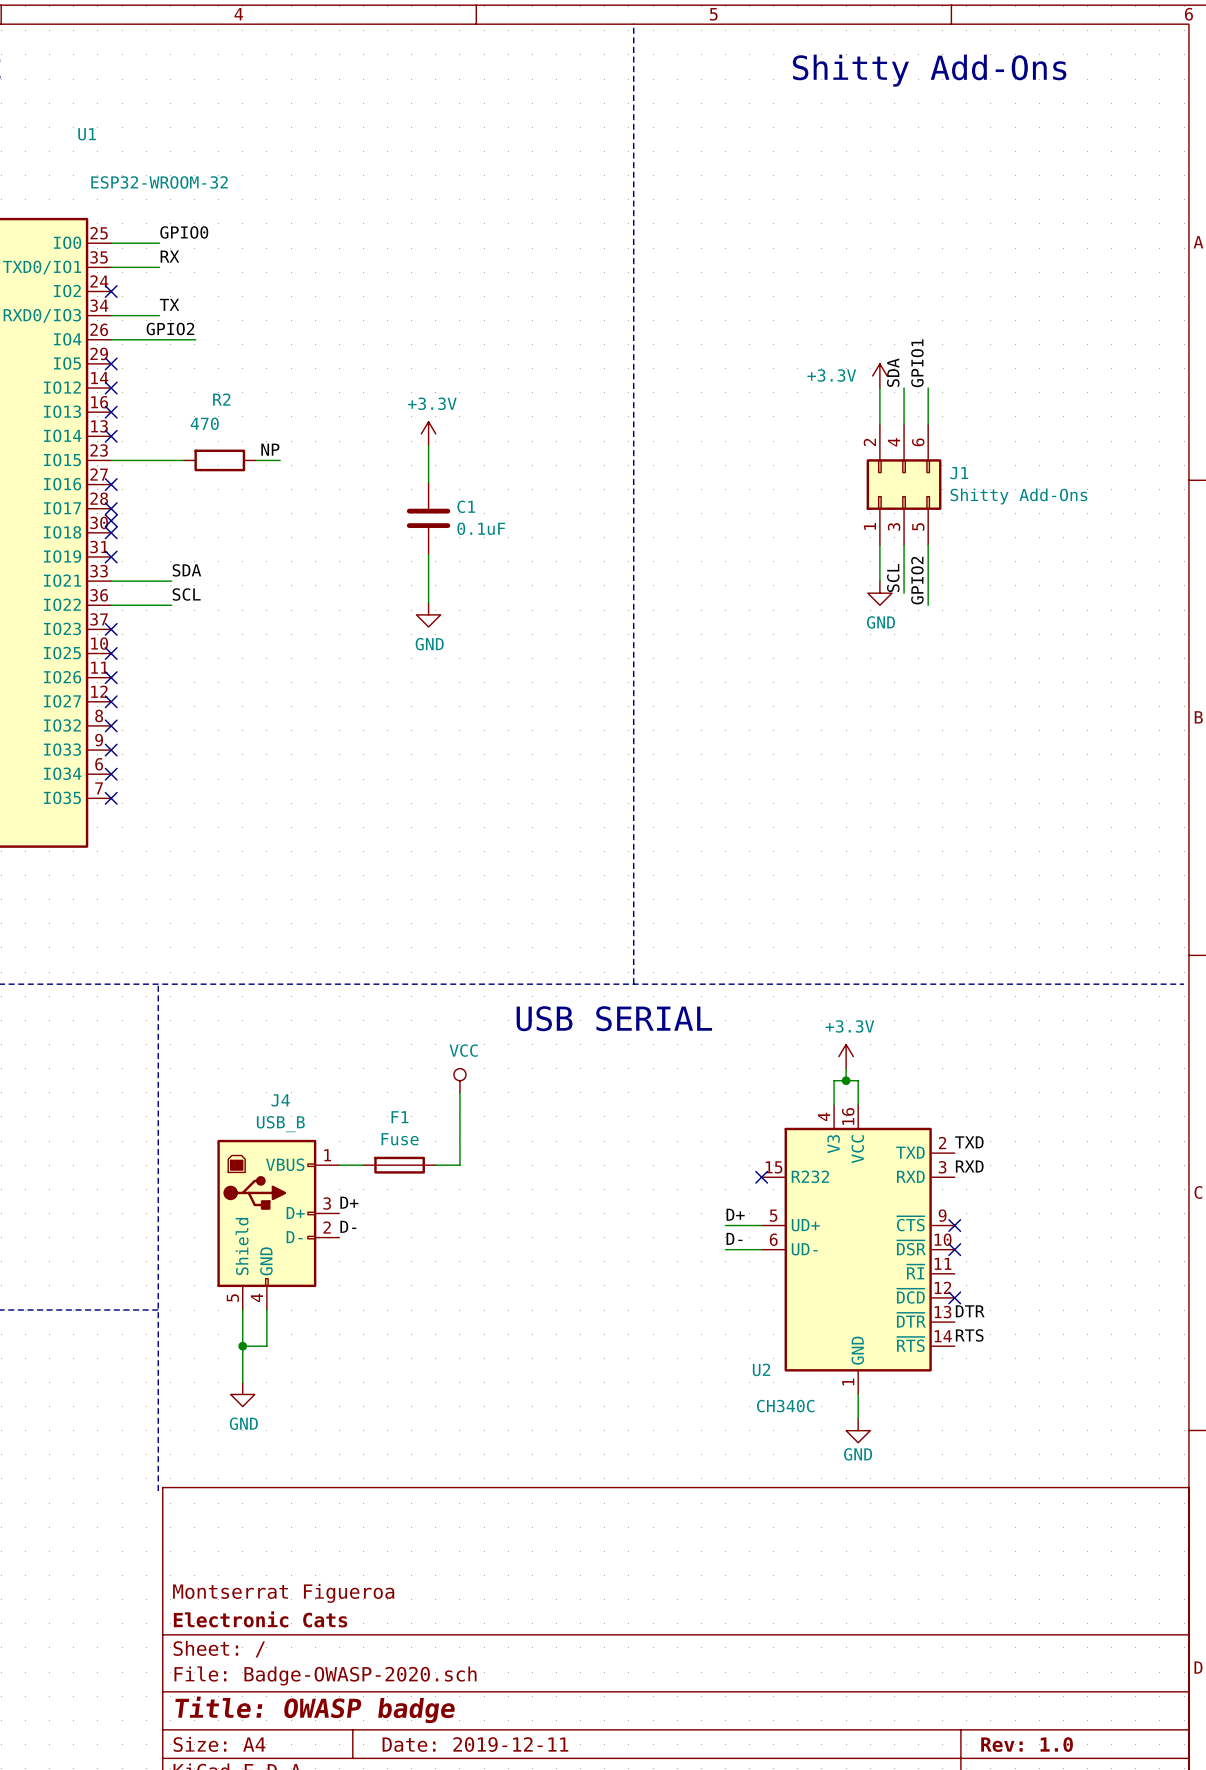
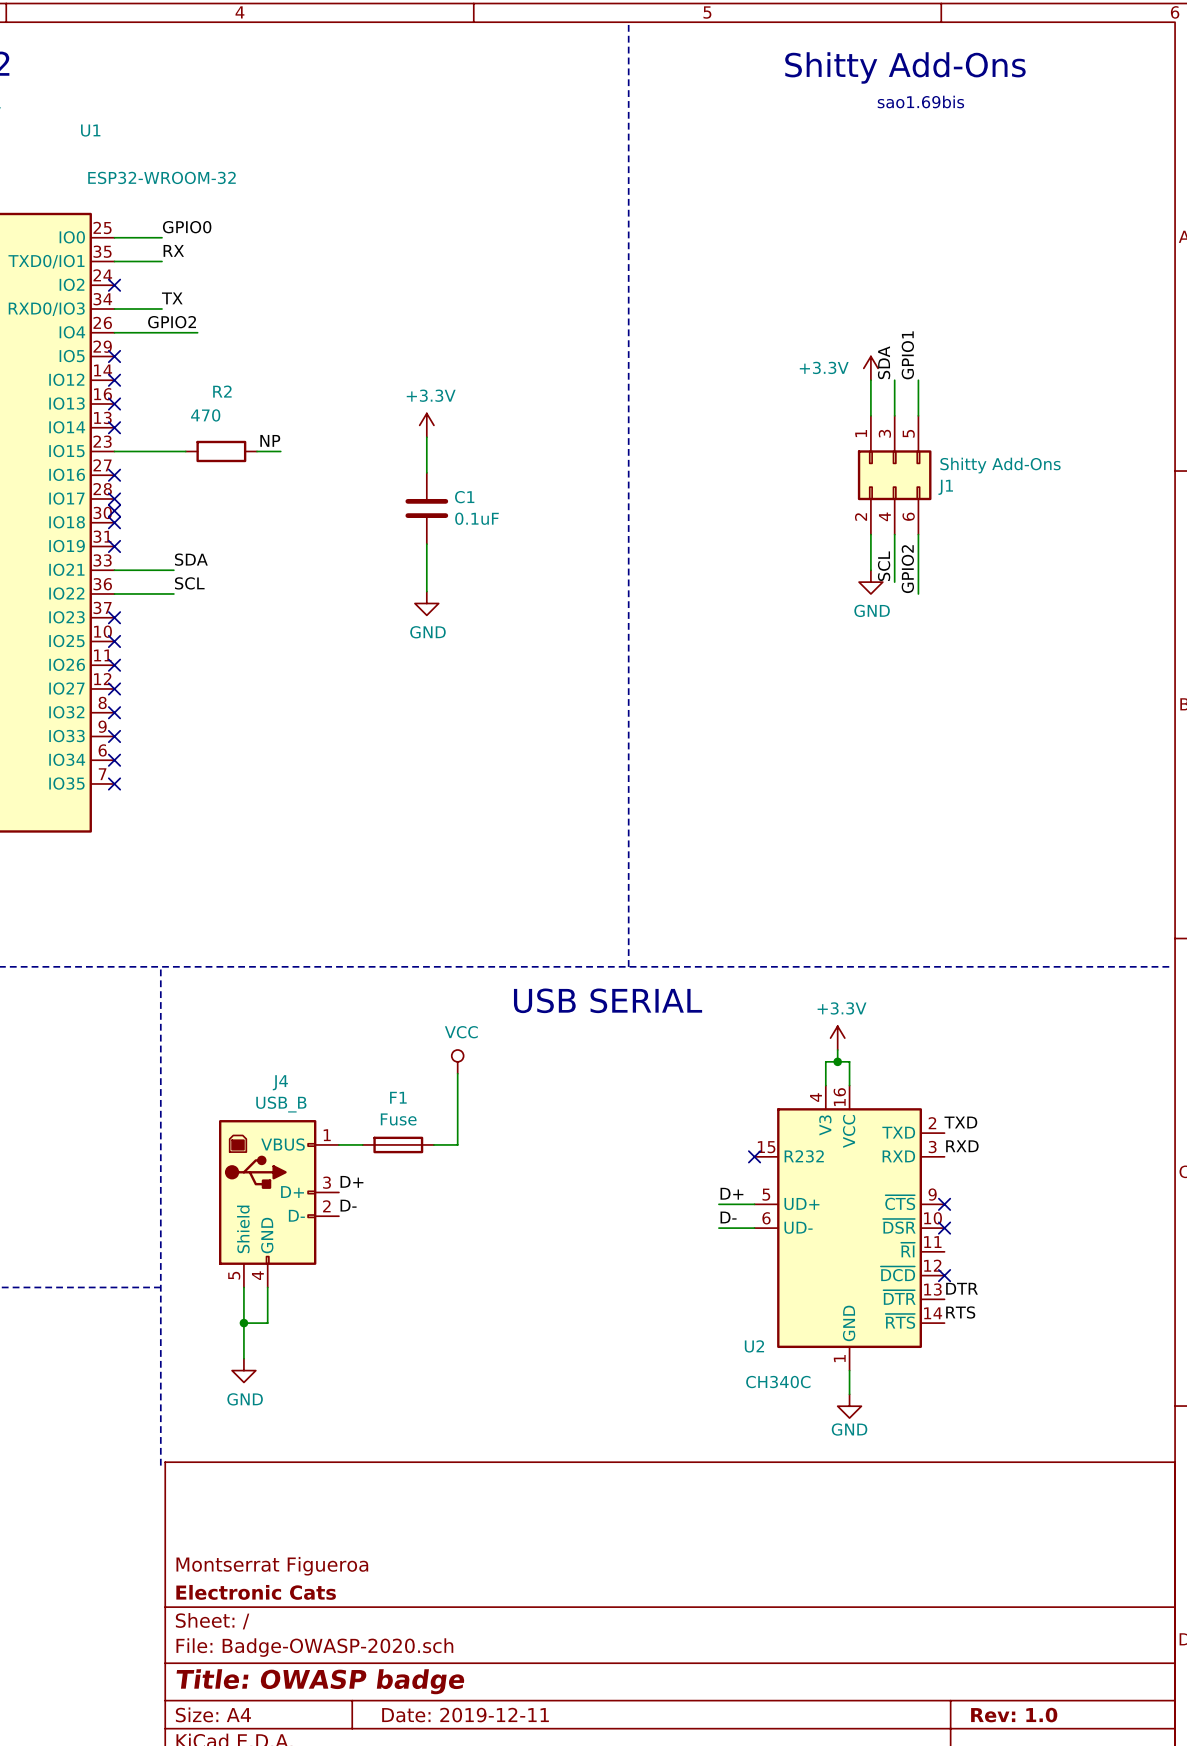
text: none -> sao1.69bis (920, 102)
J1 flip: as is (904, 484) -> up-down (894, 475)

